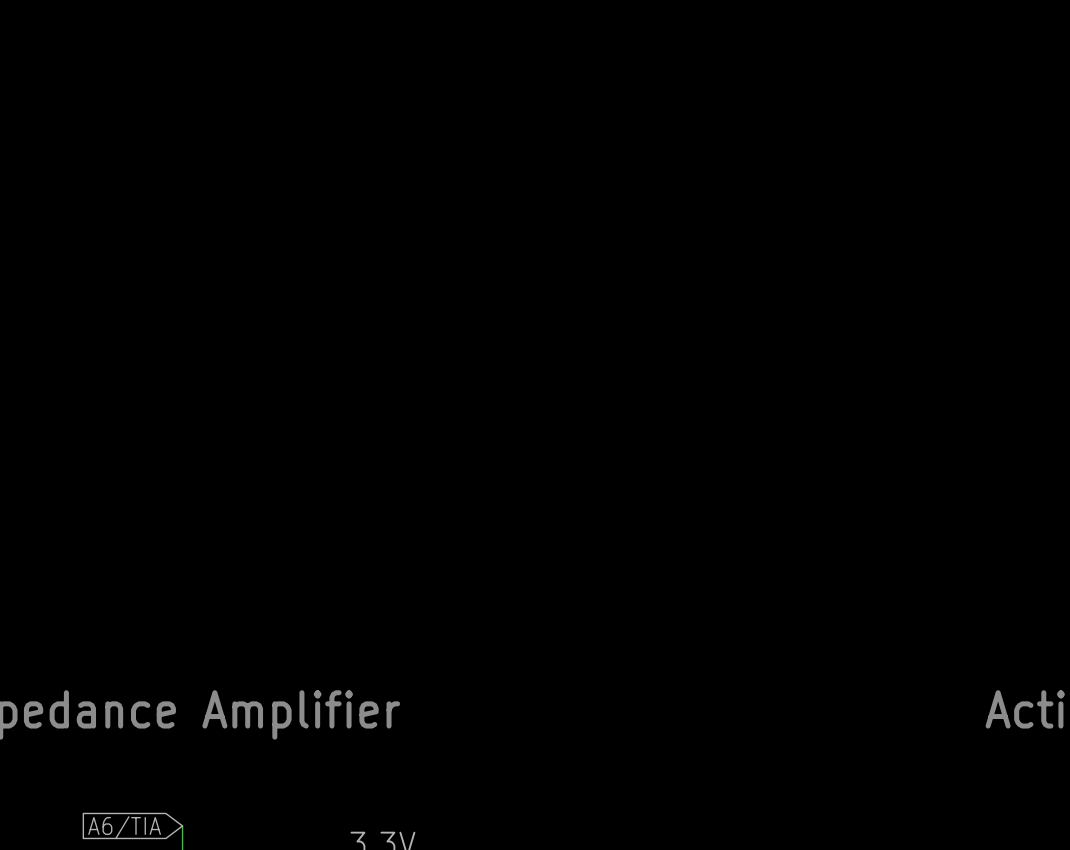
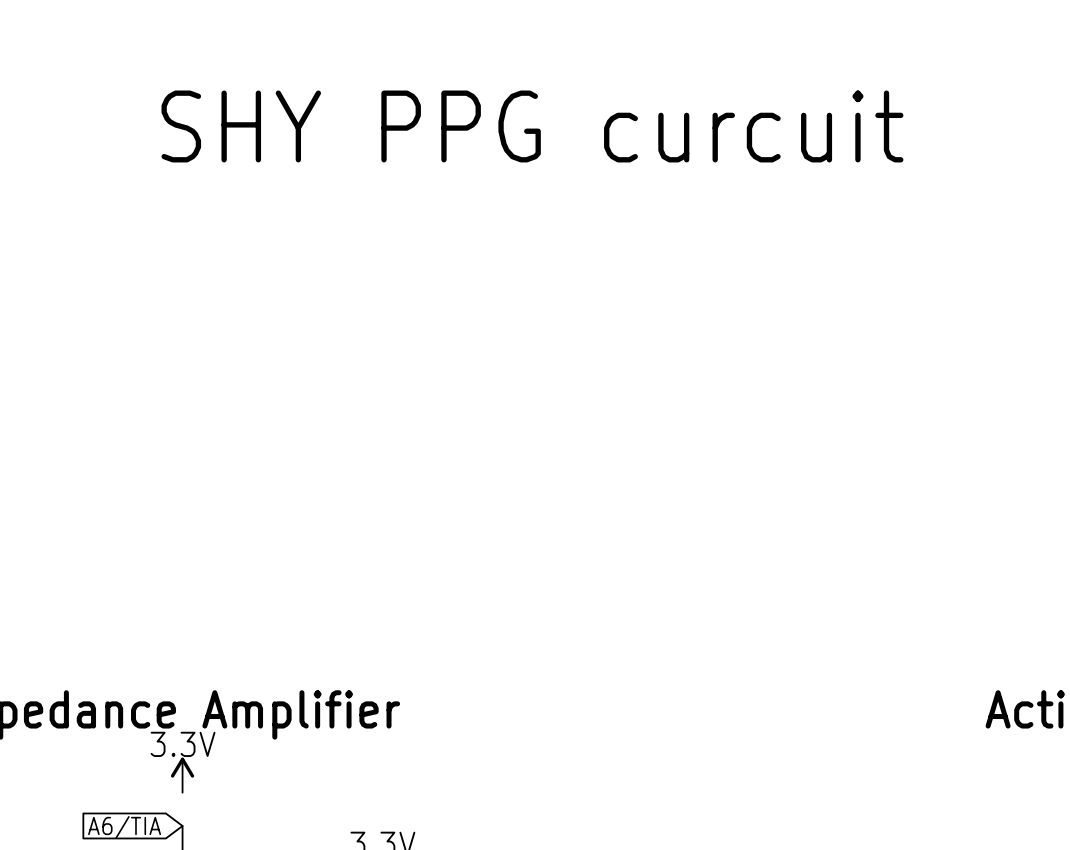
text: none -> SHY PPG curcuit (532, 126)
power symbol: none -> 3.3V (182, 775)

